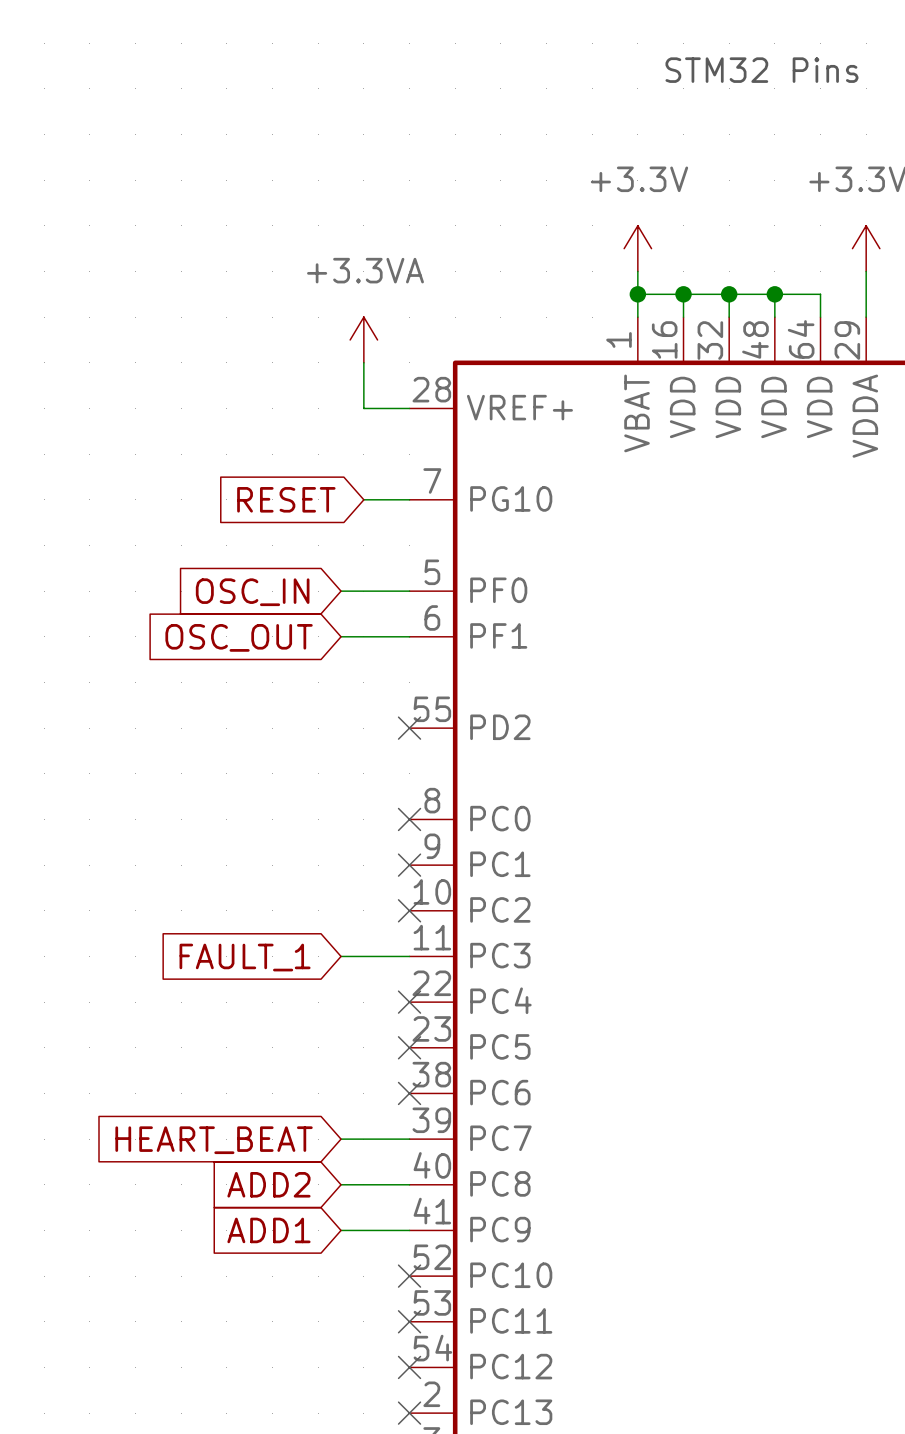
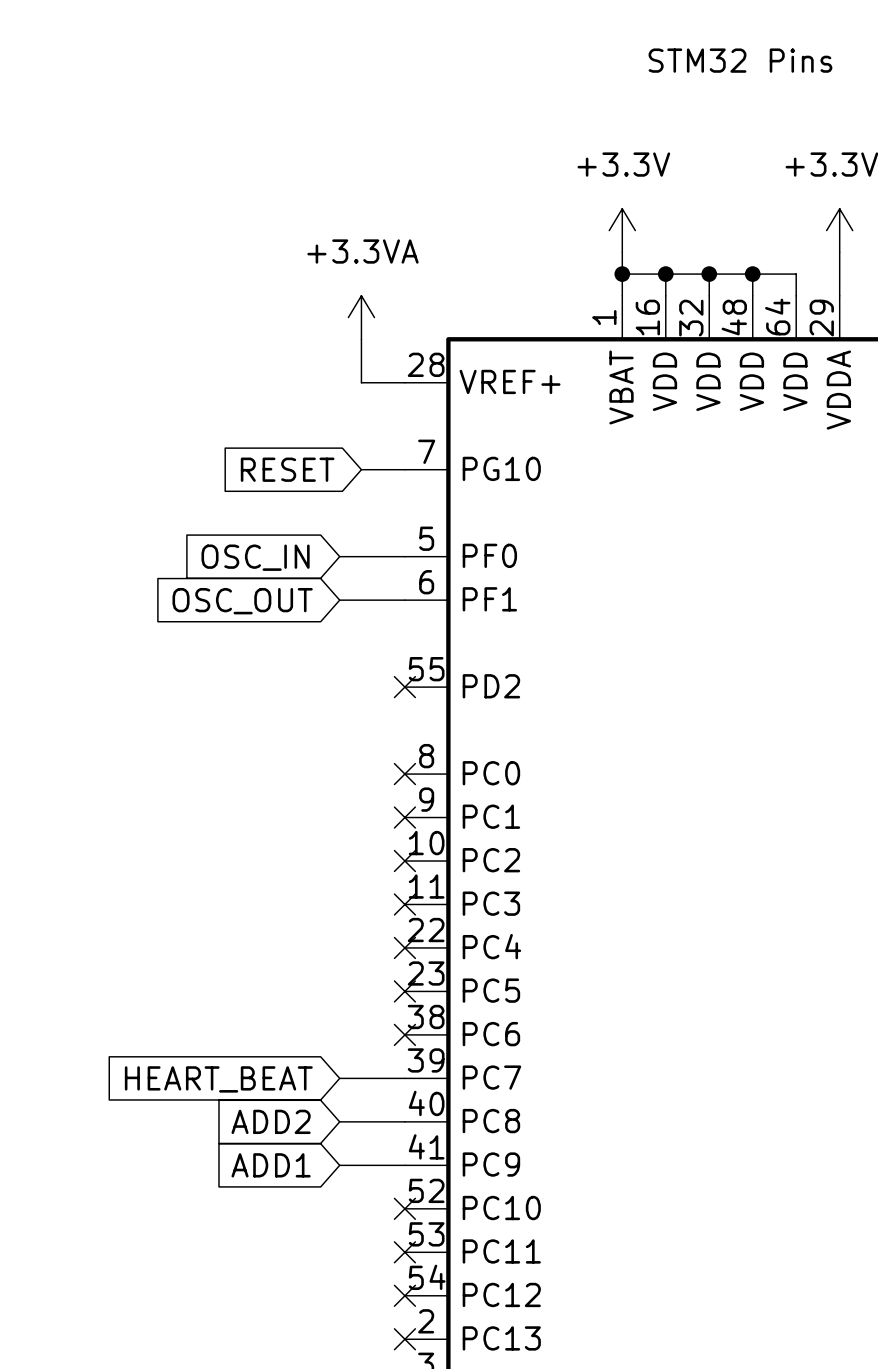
wire: (341, 956) (409, 956) -> none
no-connect mark: none -> (404, 904)
global label: FAULT_1 (245, 957) -> none

